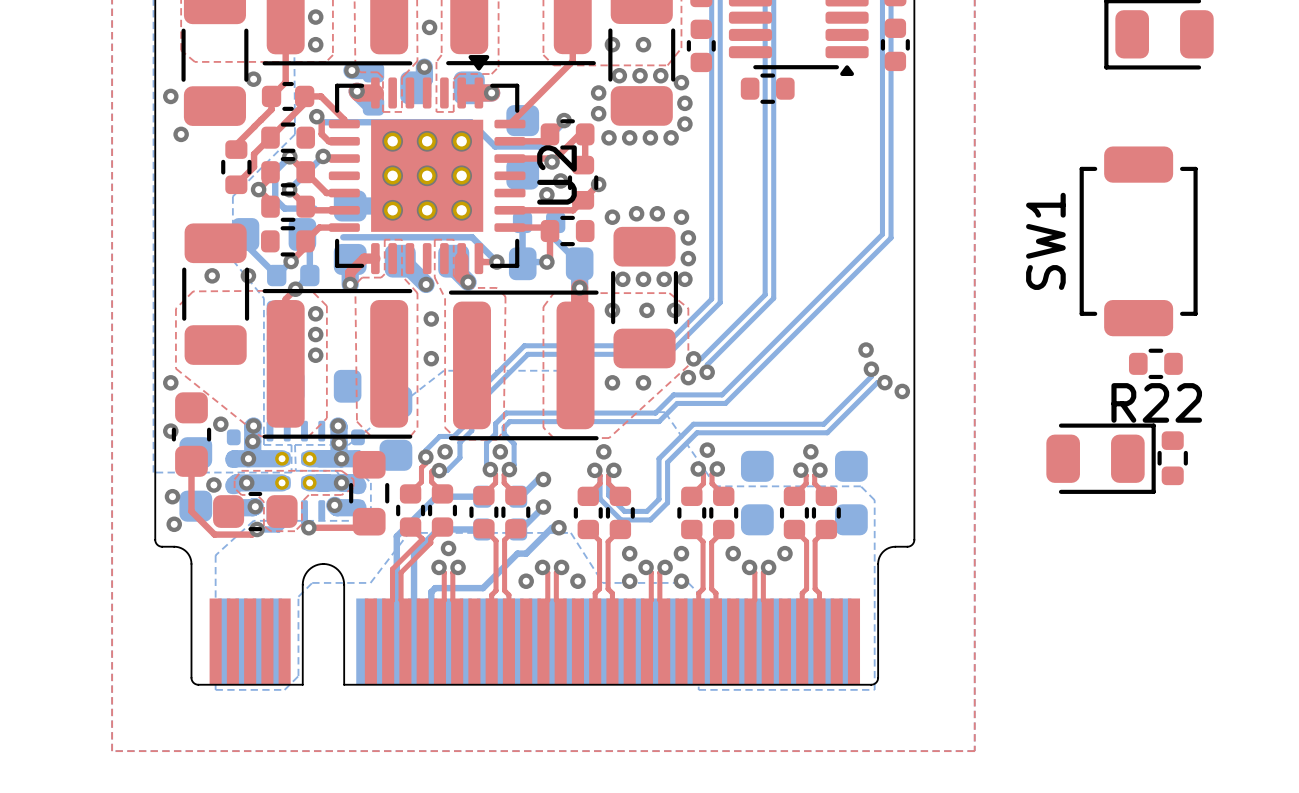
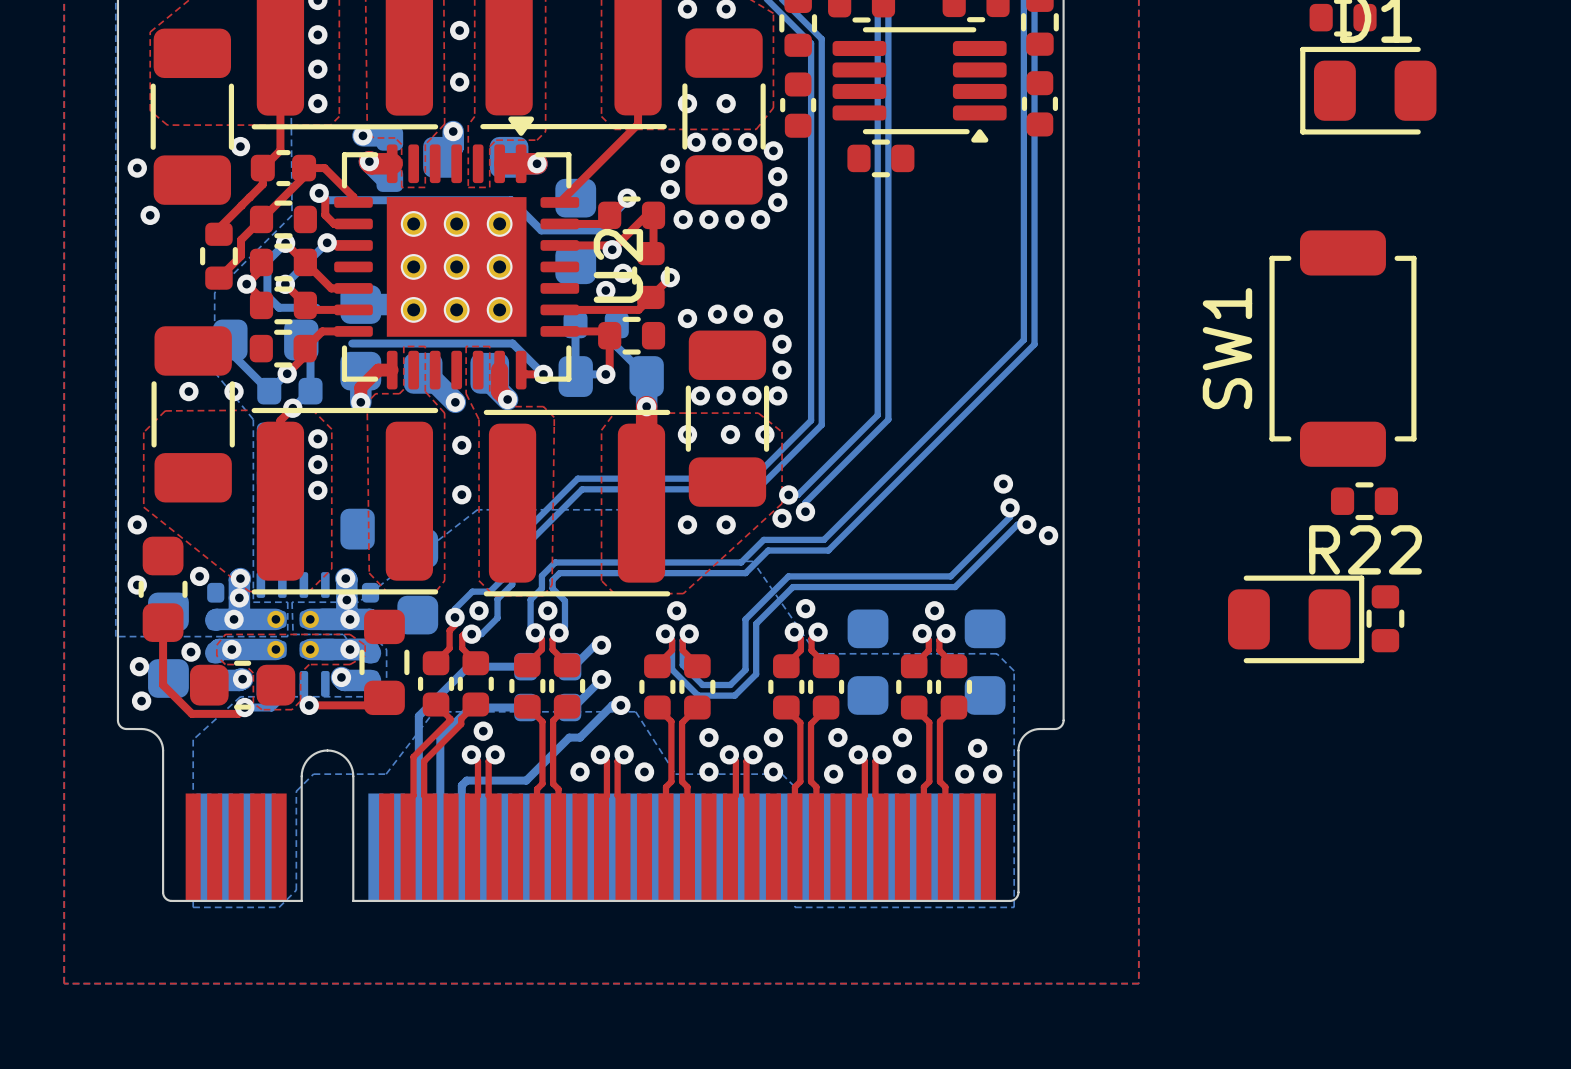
via: none -> (977, 748)
via: none -> (833, 774)
via: none -> (906, 774)
via: none -> (964, 774)
via: none -> (992, 774)

